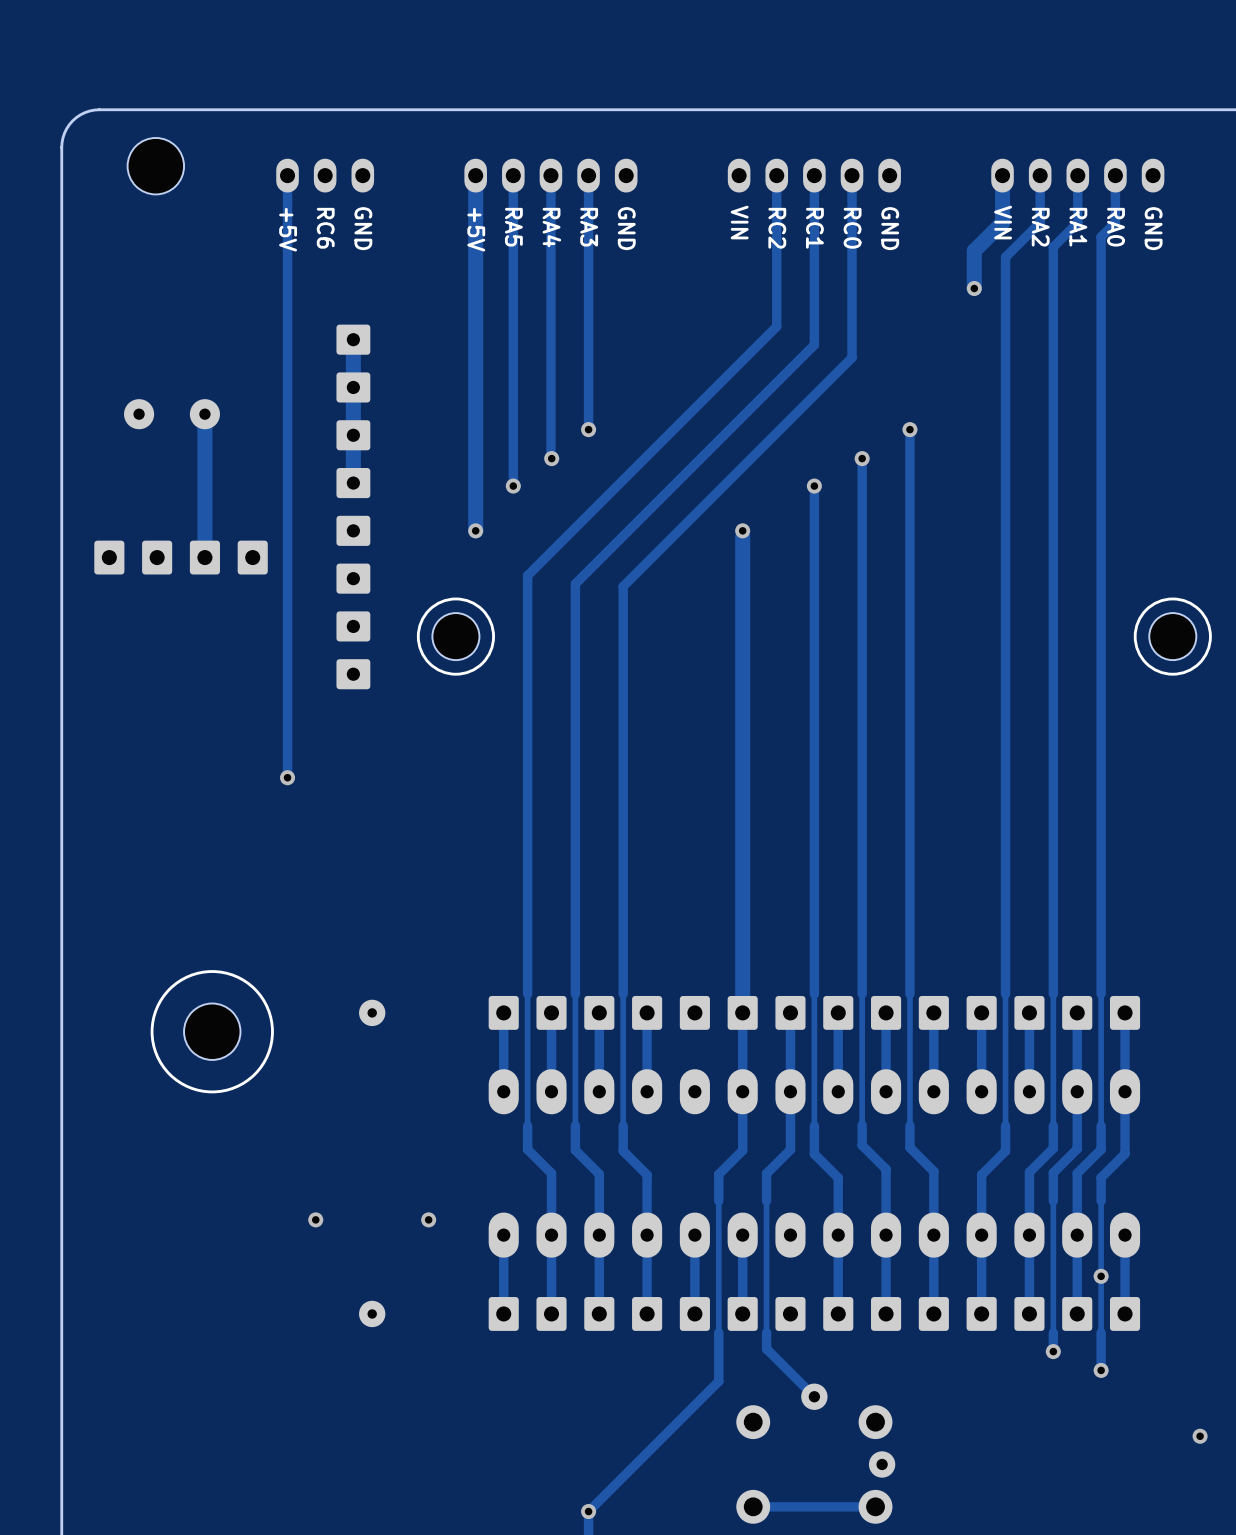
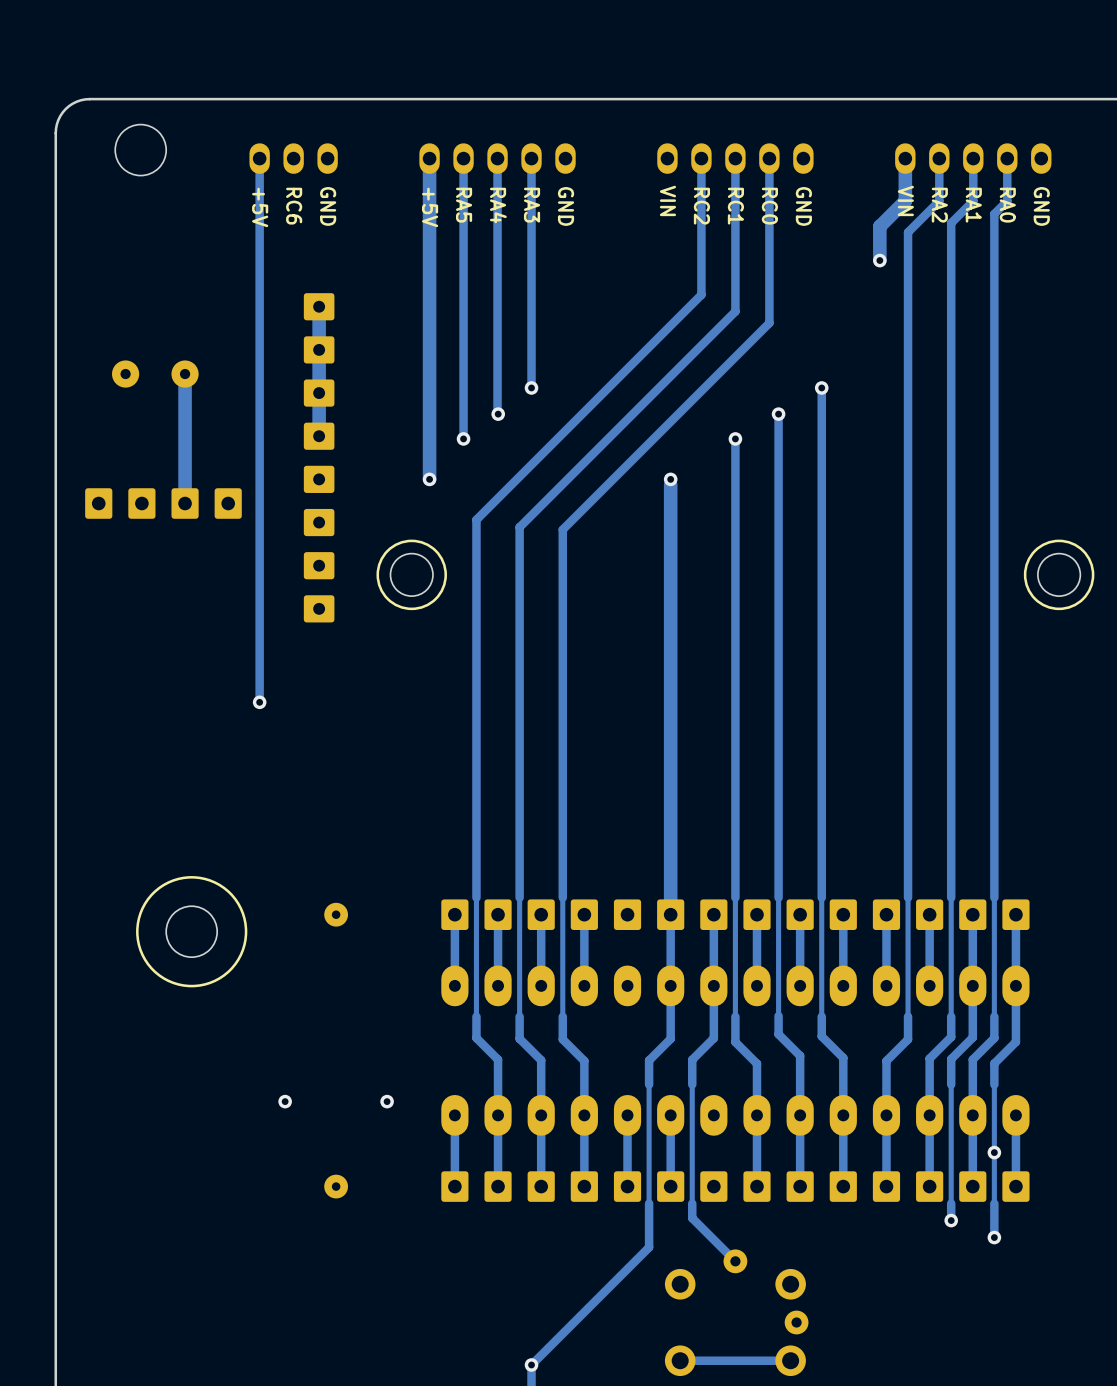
via: (1200, 1436) -> none

